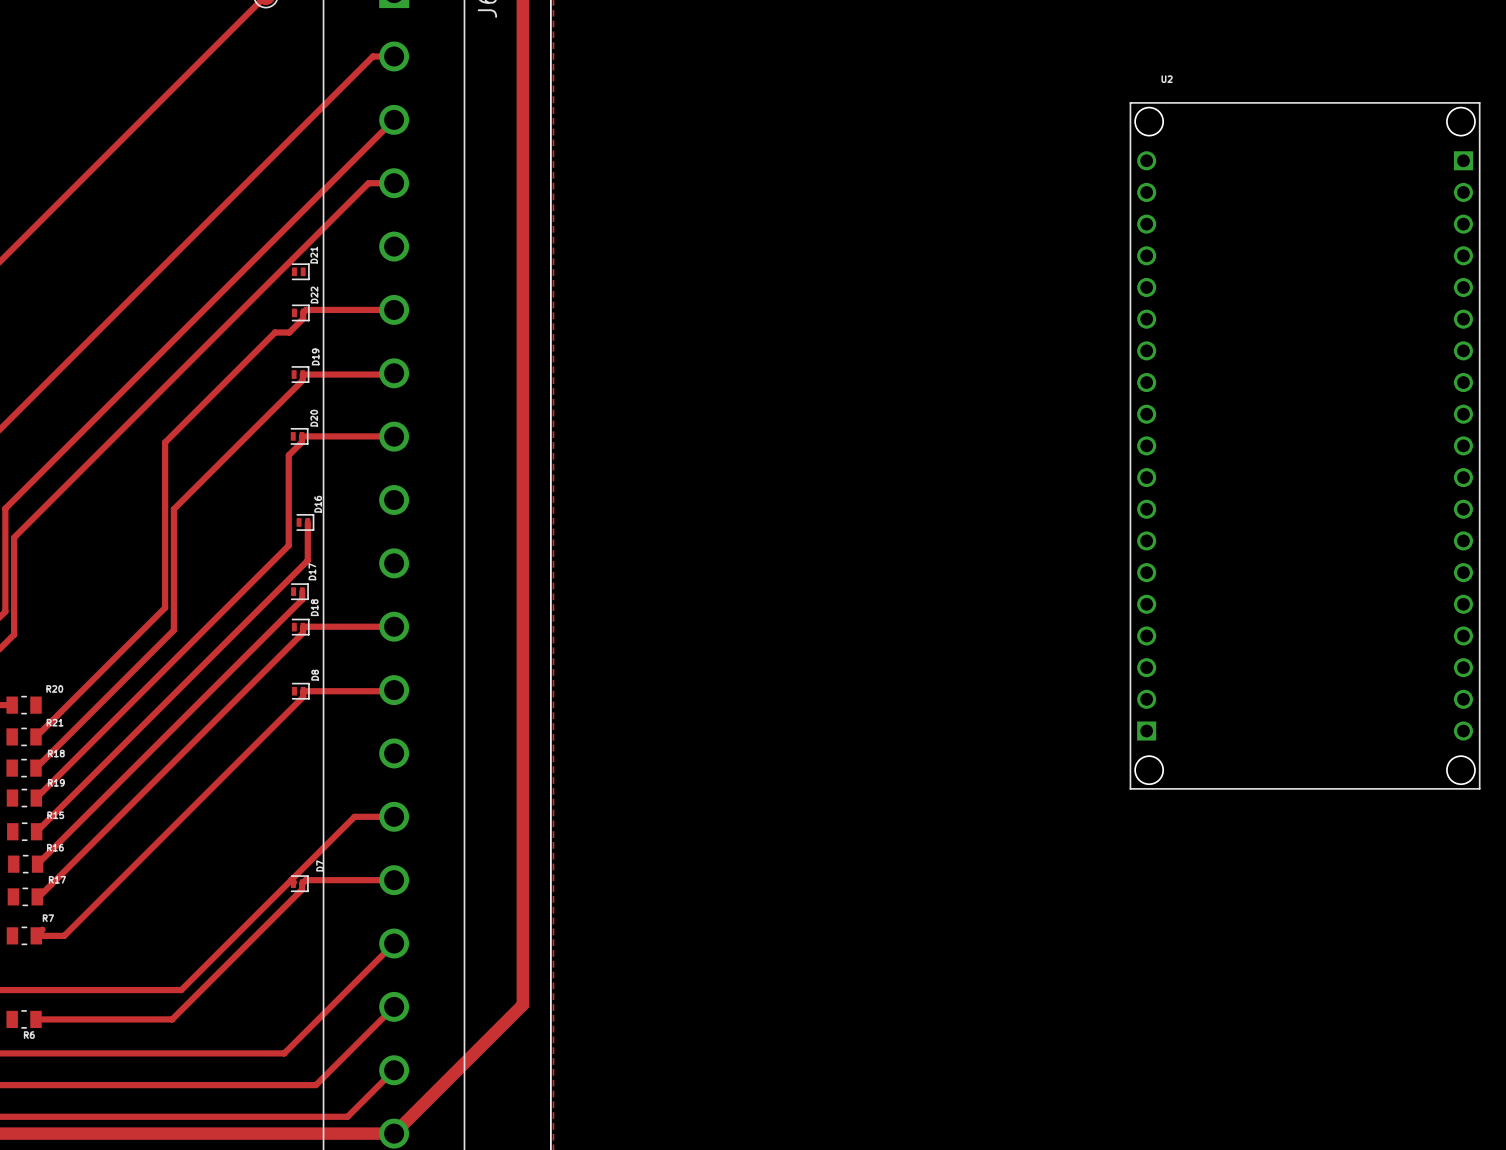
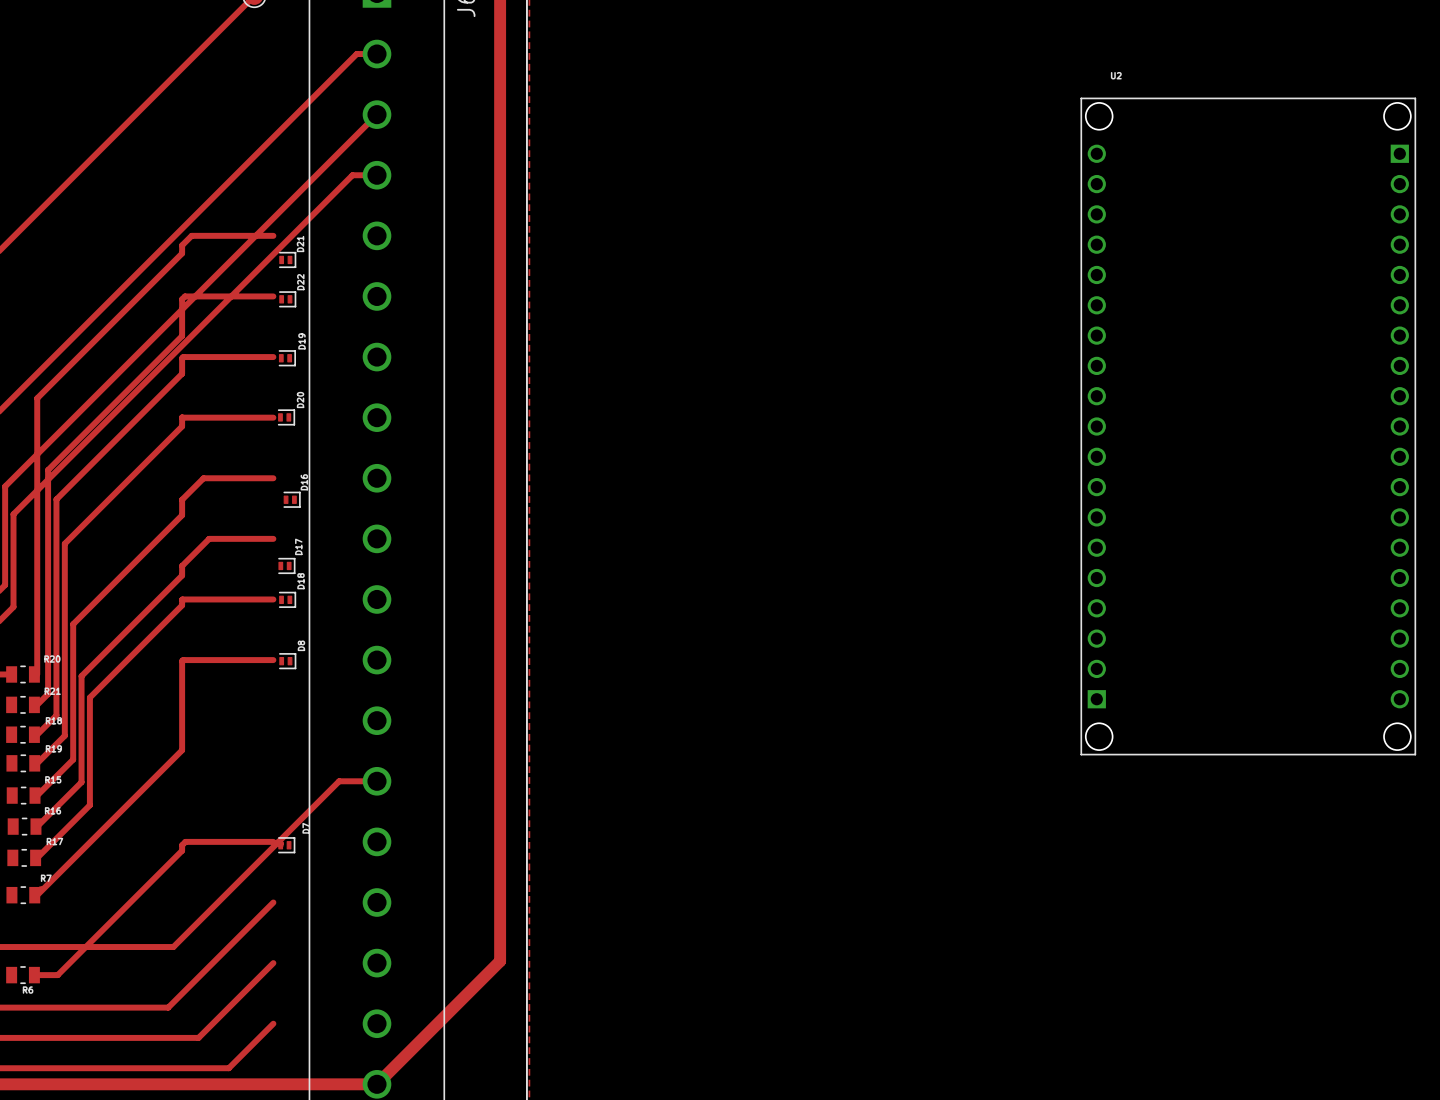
top track: none -> (273, 235) (191, 235) (182, 245) (182, 253) (37, 398) (37, 674)
top track: none -> (273, 296) (184, 296) (182, 299) (182, 336) (48, 470) (48, 694) (37, 704)
top track: (394, 309) (306, 309) (303, 312) (303, 318) (289, 332) (275, 332) (165, 442) (165, 607) (35, 736) -> none
top track: none -> (273, 357) (183, 357) (182, 373) (56, 499) (56, 715) (37, 734)
top track: (394, 373) (302, 374) (302, 380) (173, 509) (173, 630) (35, 768) -> none
top track: none -> (273, 417) (182, 417) (182, 426) (64, 543) (64, 735) (37, 763)
top track: (394, 436) (301, 436) (301, 442) (288, 455) (288, 545) (36, 798) -> none
top track: none -> (273, 478) (203, 478) (182, 499) (182, 515) (73, 624) (73, 759) (37, 795)
top track: (307, 522) (307, 560) (36, 831) -> none
top track: none -> (273, 538) (209, 538) (182, 565) (182, 575) (81, 676) (81, 782) (37, 826)
top track: (302, 591) (302, 599) (37, 864) -> none
top track: (394, 626) (303, 627) (303, 632) (39, 896) -> (273, 599) (182, 599) (182, 605) (89, 697) (89, 805) (37, 857)
top track: none -> (273, 660) (183, 660) (182, 750) (37, 895)
top track: (394, 690) (303, 691) (303, 696) (64, 935) (36, 935) -> none
top track: (394, 880) (305, 880) (302, 883) (302, 889) (172, 1019) (60, 1019) -> (273, 841) (185, 841) (182, 845) (182, 850) (57, 975)
top track: (394, 943) (284, 1053) (175, 1053) -> (273, 902) (168, 1007)
top track: (394, 1006) (315, 1085) (207, 1085) -> (273, 963) (198, 1037)
top track: (394, 1070) (347, 1116) (239, 1116) -> (273, 1023) (228, 1068)

